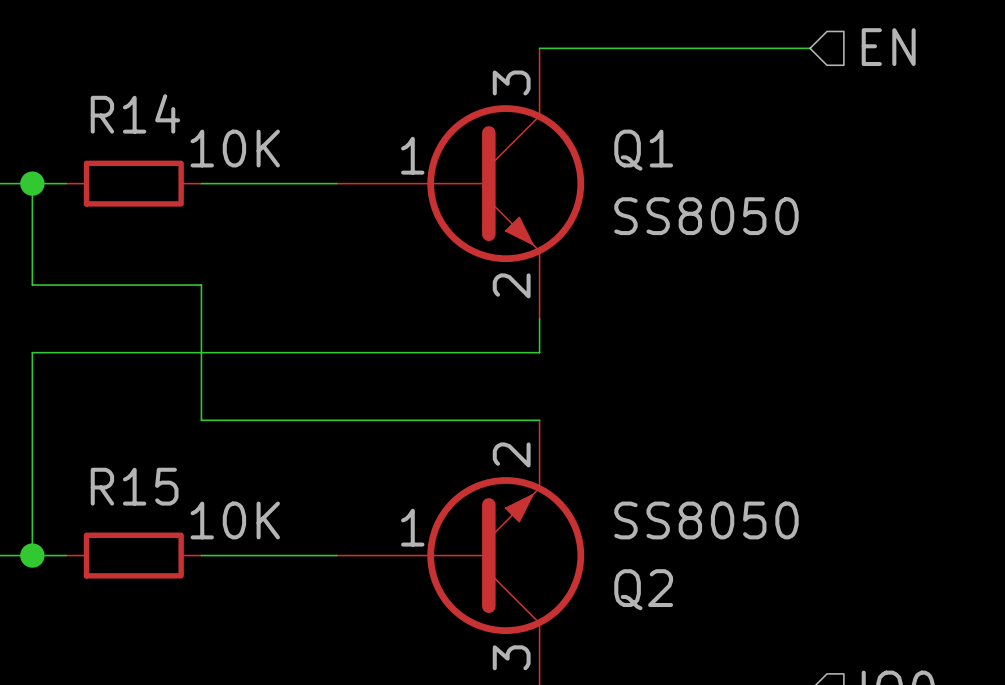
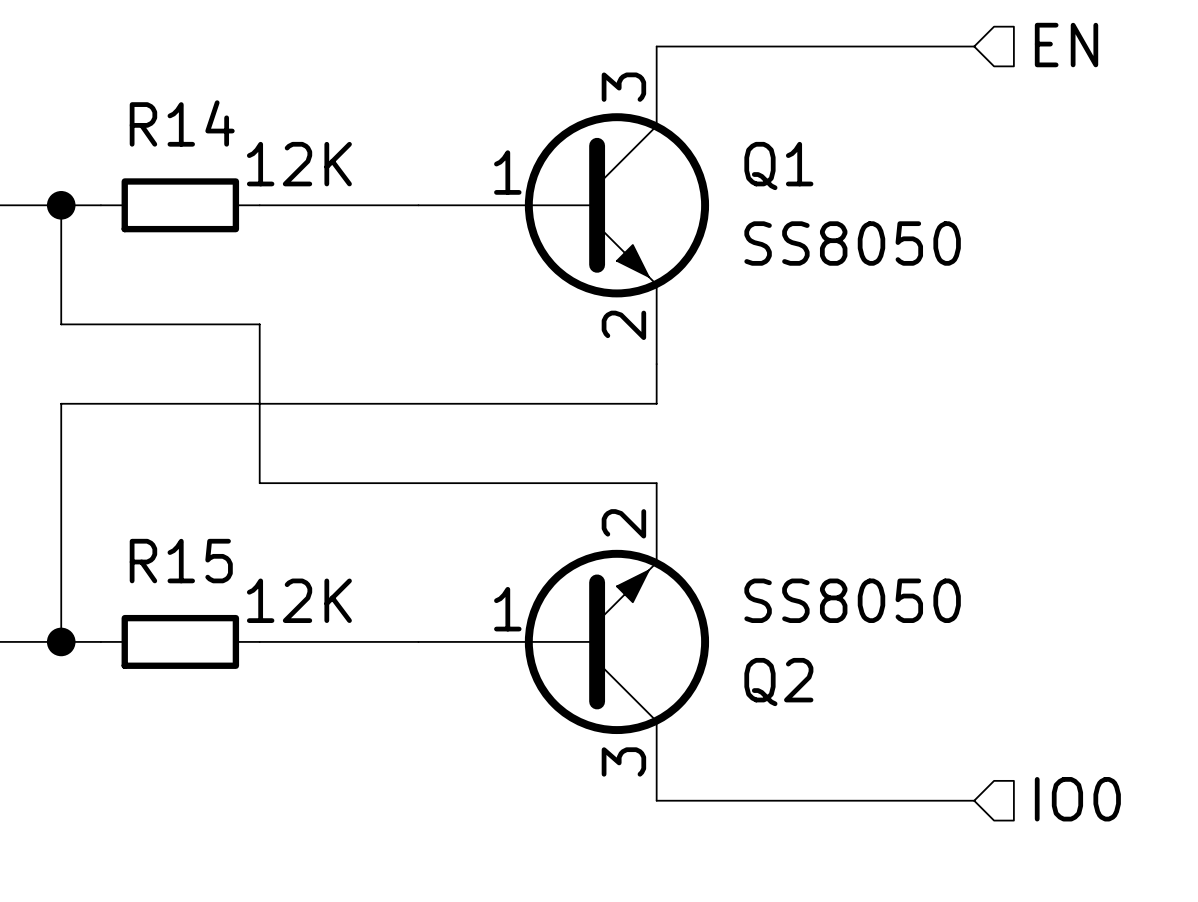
R14 value: 10K (235, 148) -> 12K (299, 164)
R15 value: 10K (235, 520) -> 12K (299, 600)

